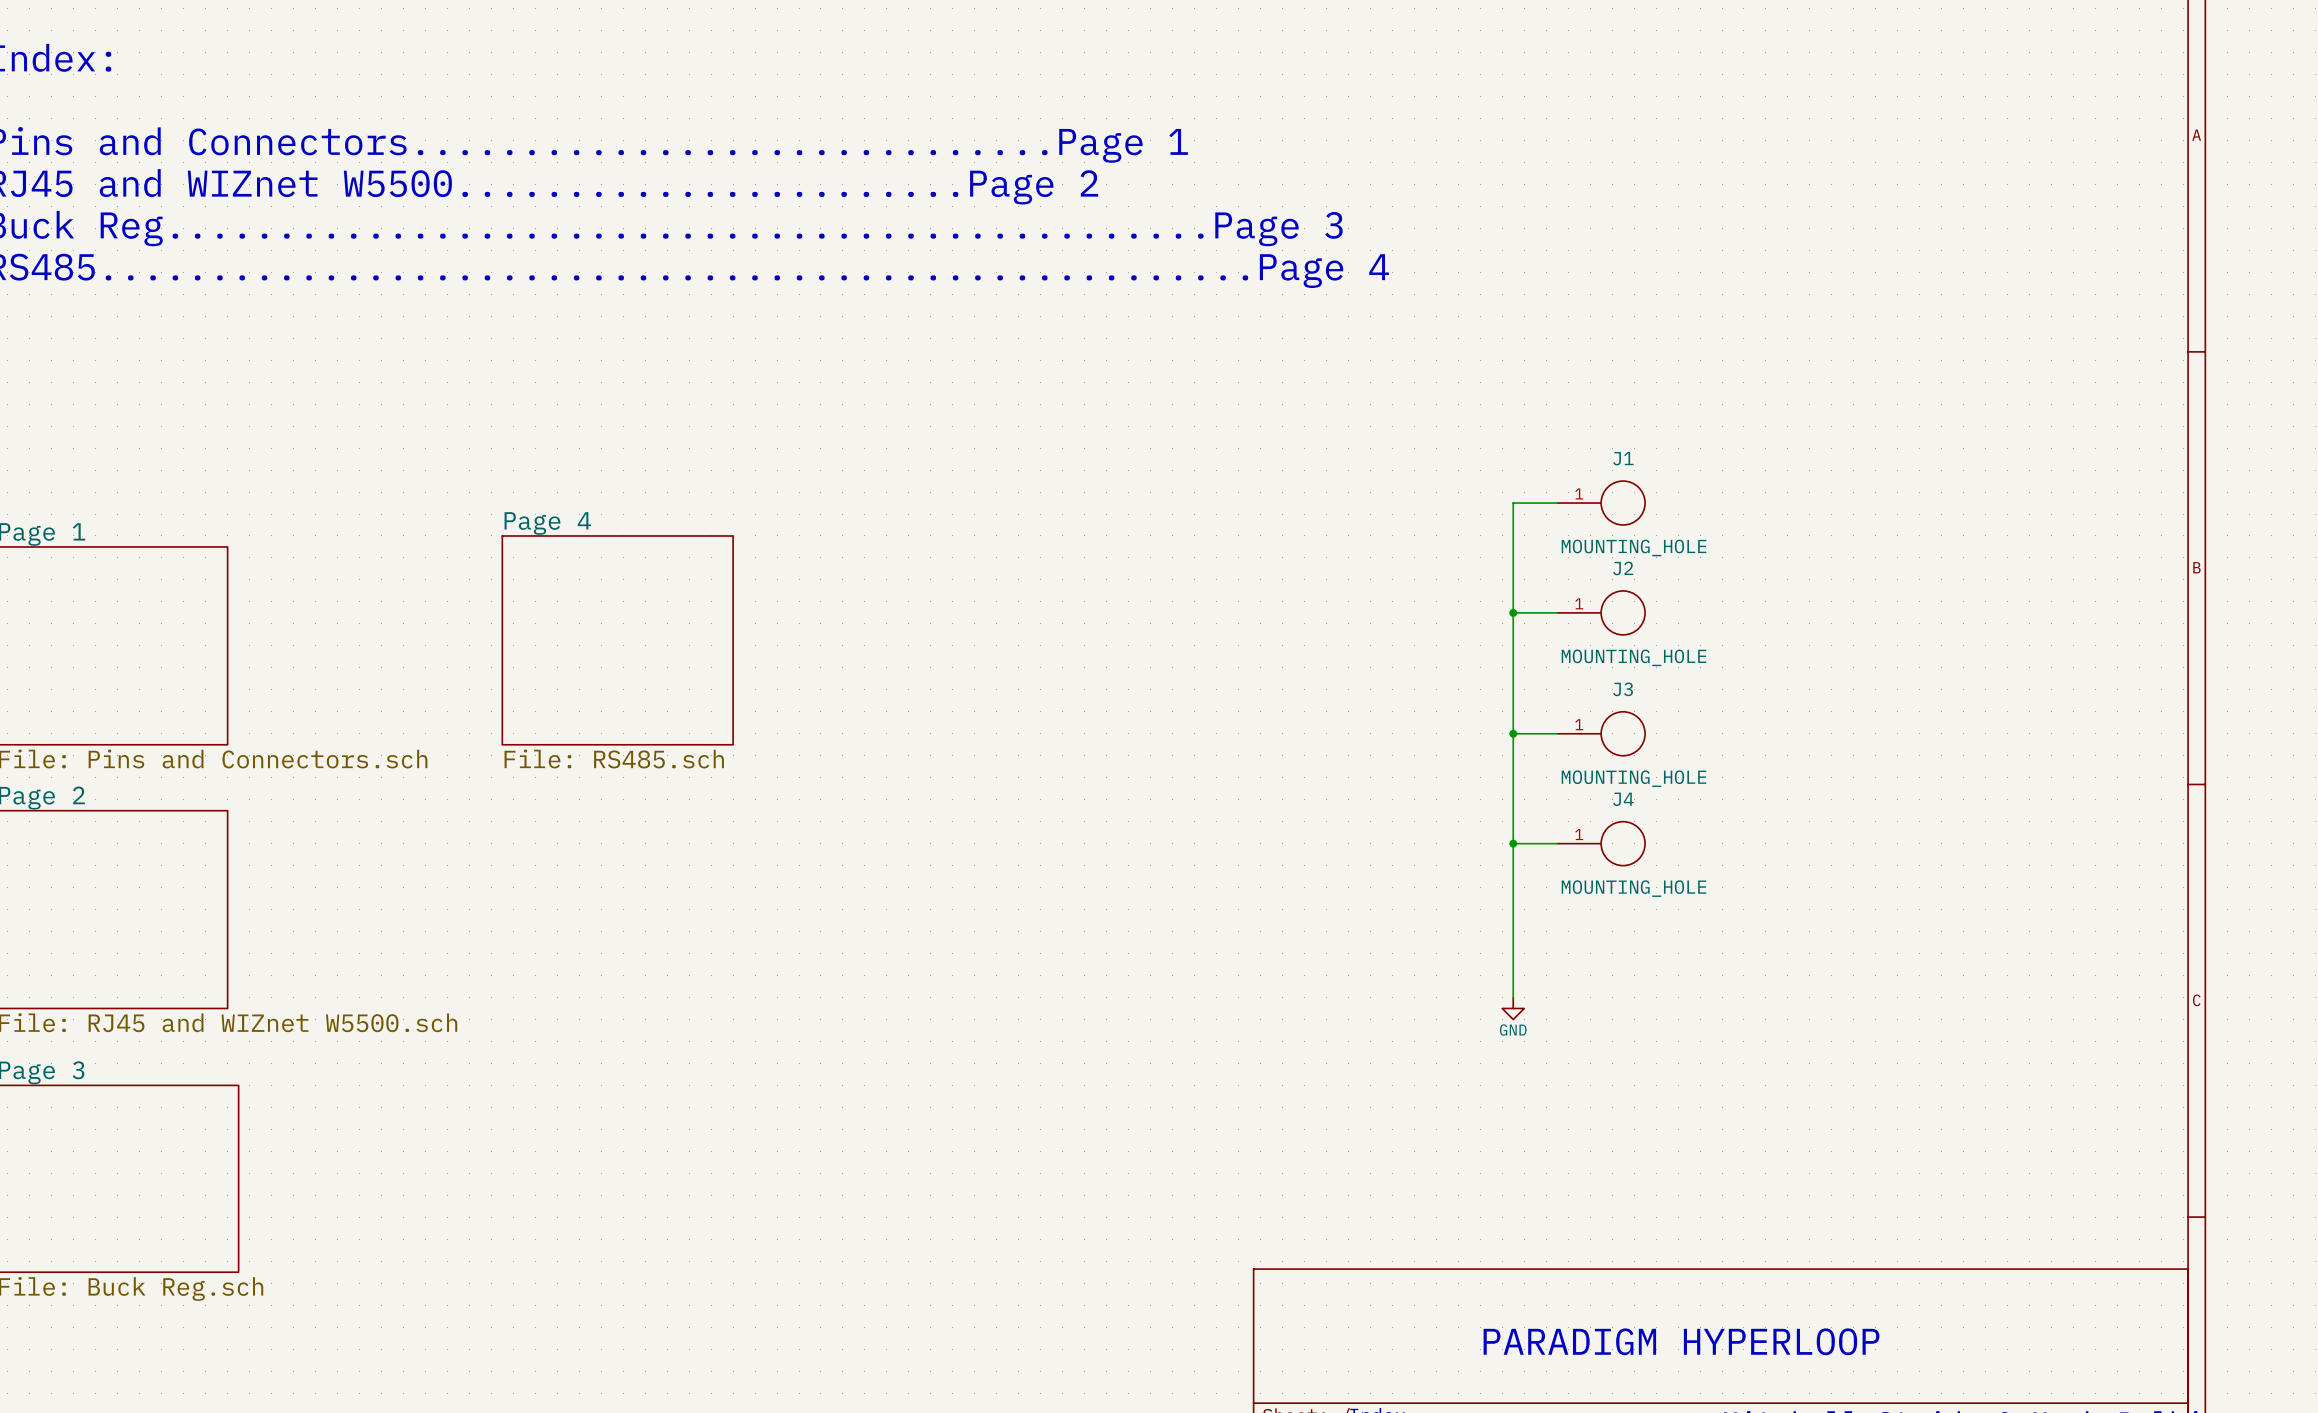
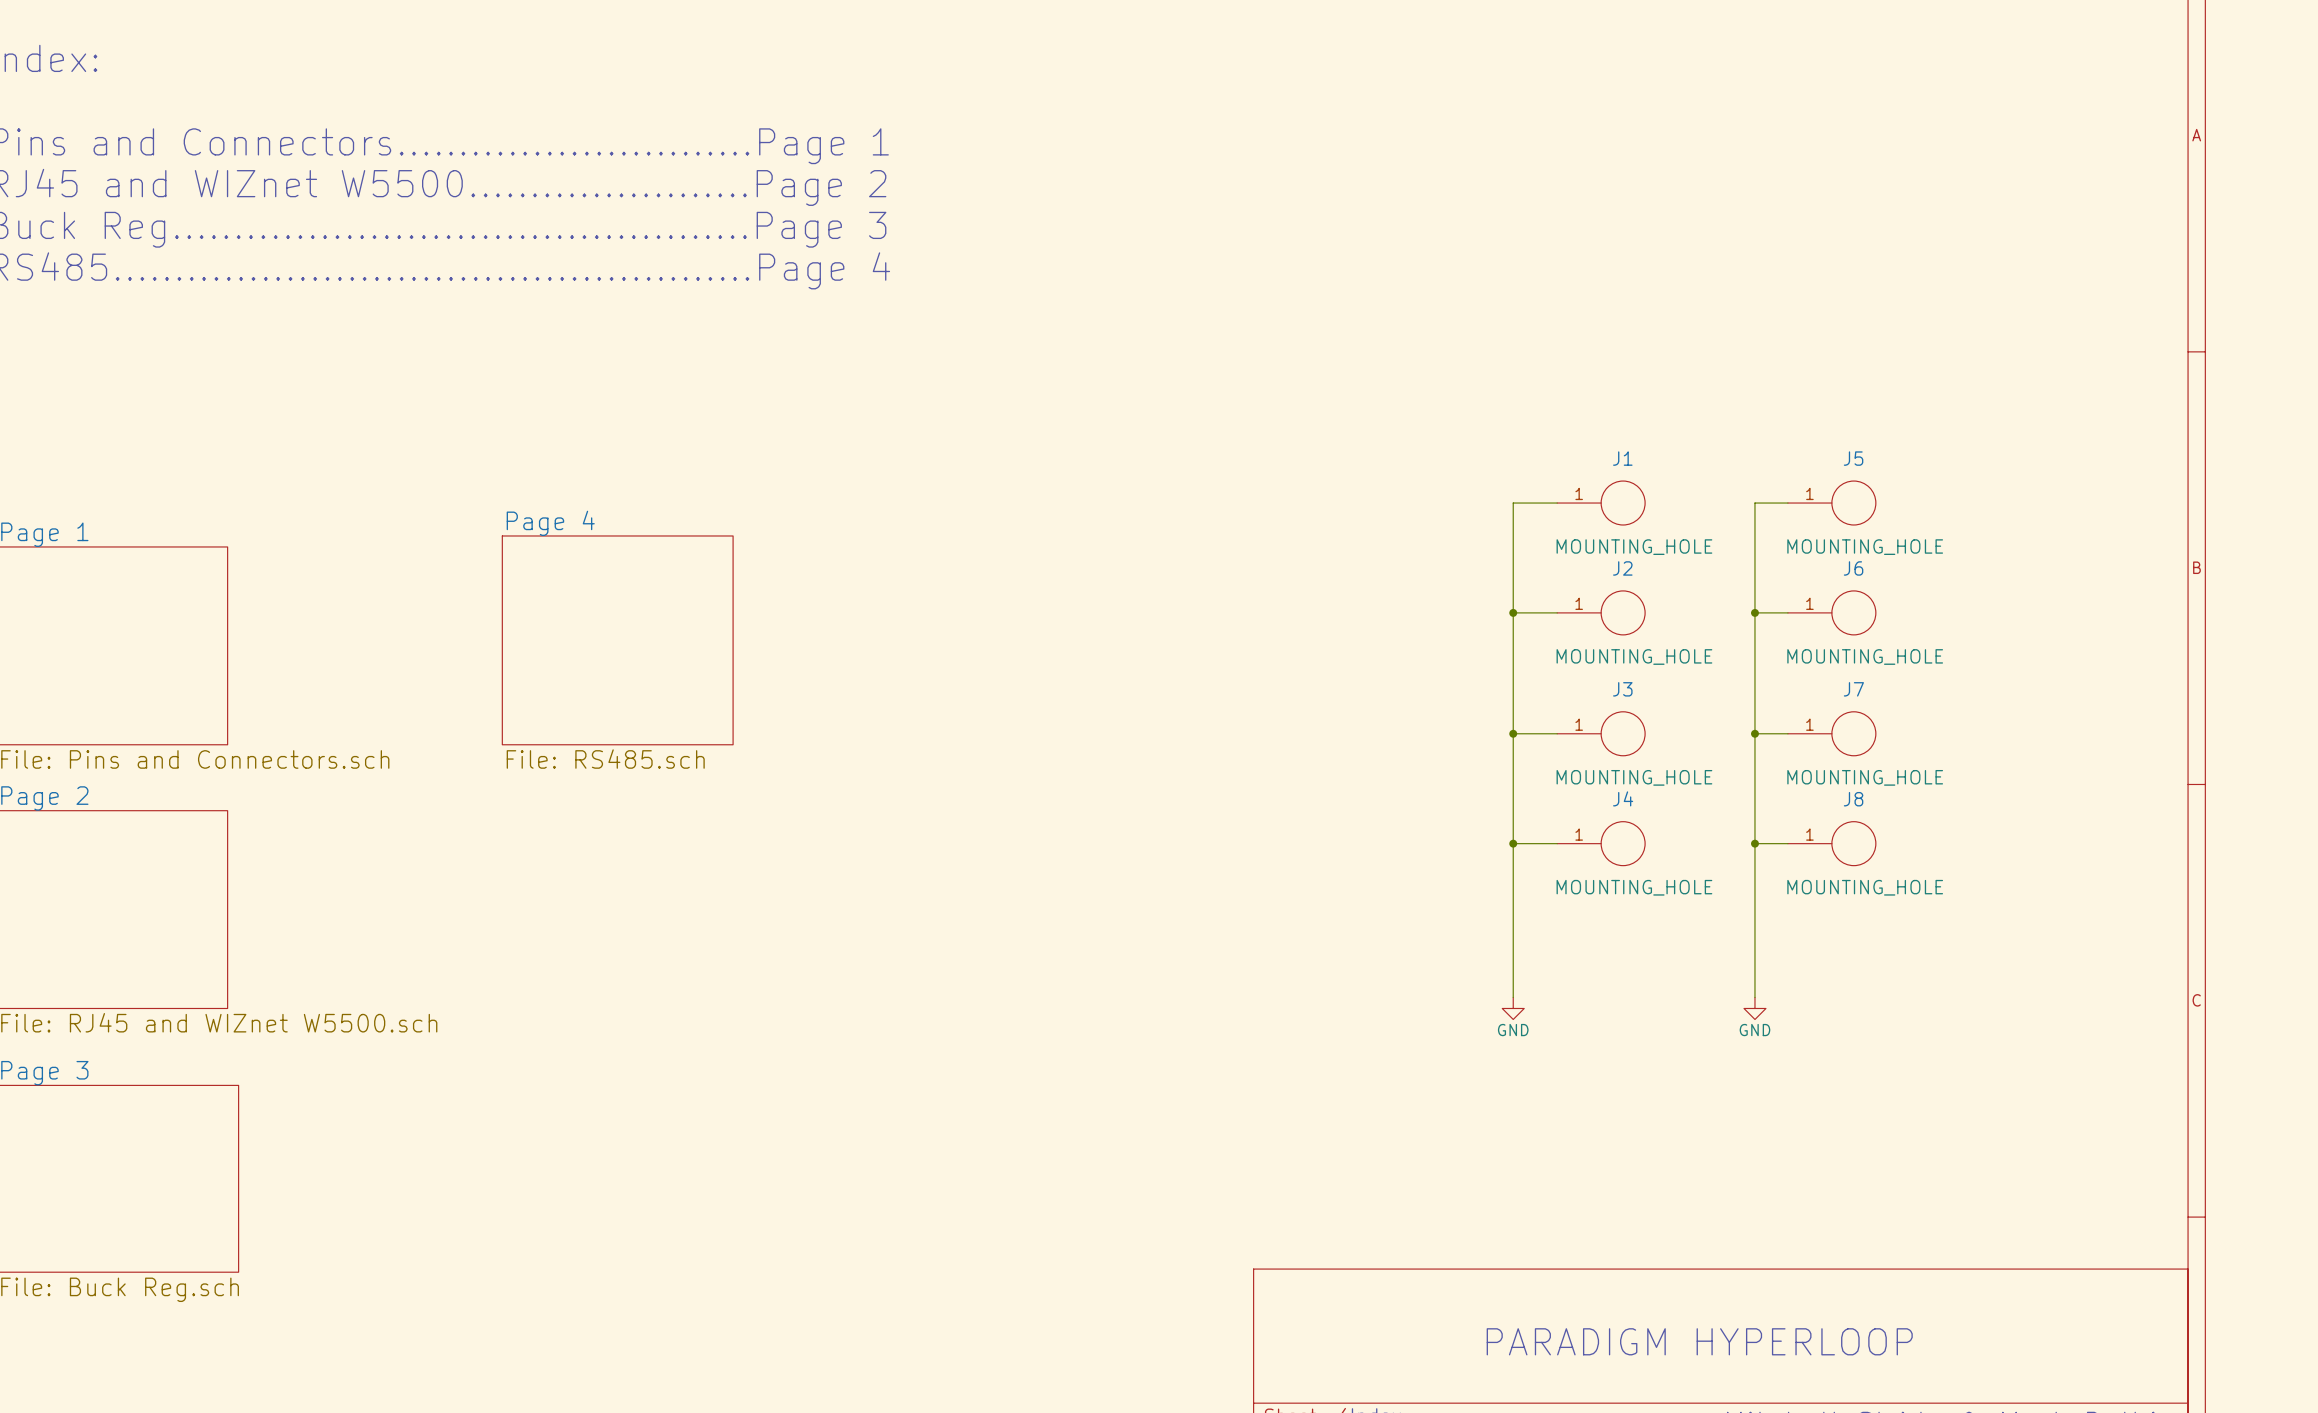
wire: none -> (1787, 503) (1754, 503) (1754, 997)
J5: none -> MOUNTING_HOLE (1831, 503)
wire: none -> (1754, 612) (1787, 612)
junction: none -> (1754, 612)
J6: none -> MOUNTING_HOLE (1831, 612)
wire: none -> (1754, 733) (1787, 733)
junction: none -> (1754, 733)
J7: none -> MOUNTING_HOLE (1831, 733)
wire: none -> (1754, 843) (1787, 843)
junction: none -> (1754, 843)
J8: none -> MOUNTING_HOLE (1831, 843)
power symbol: none -> GND (1754, 1008)

